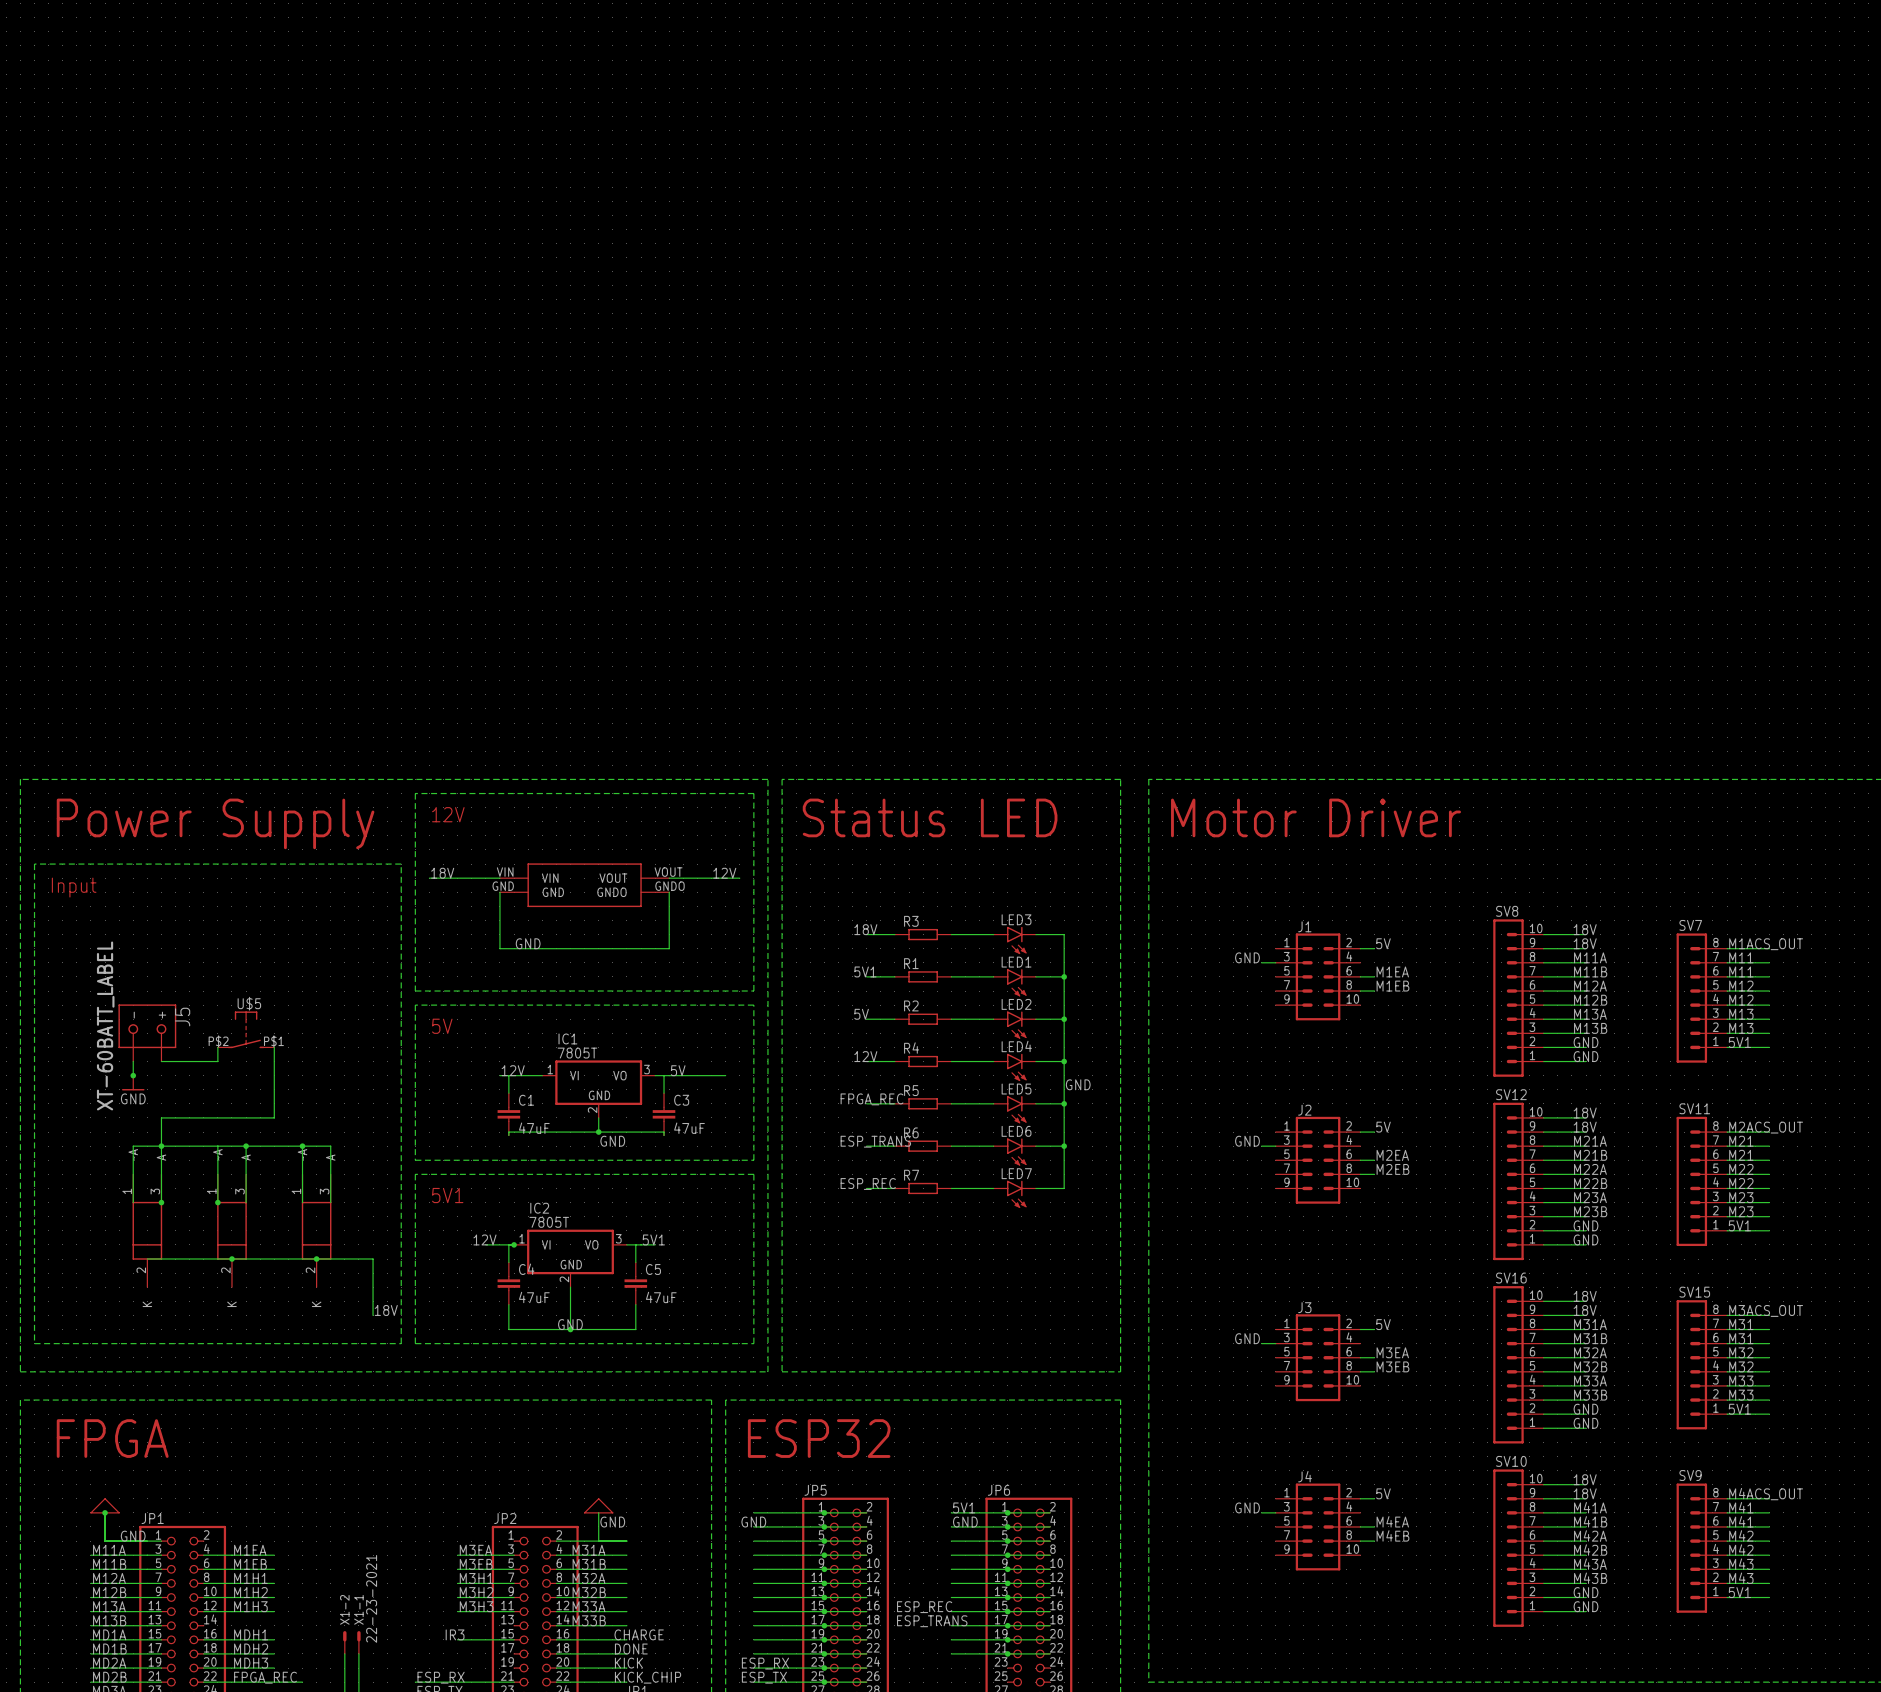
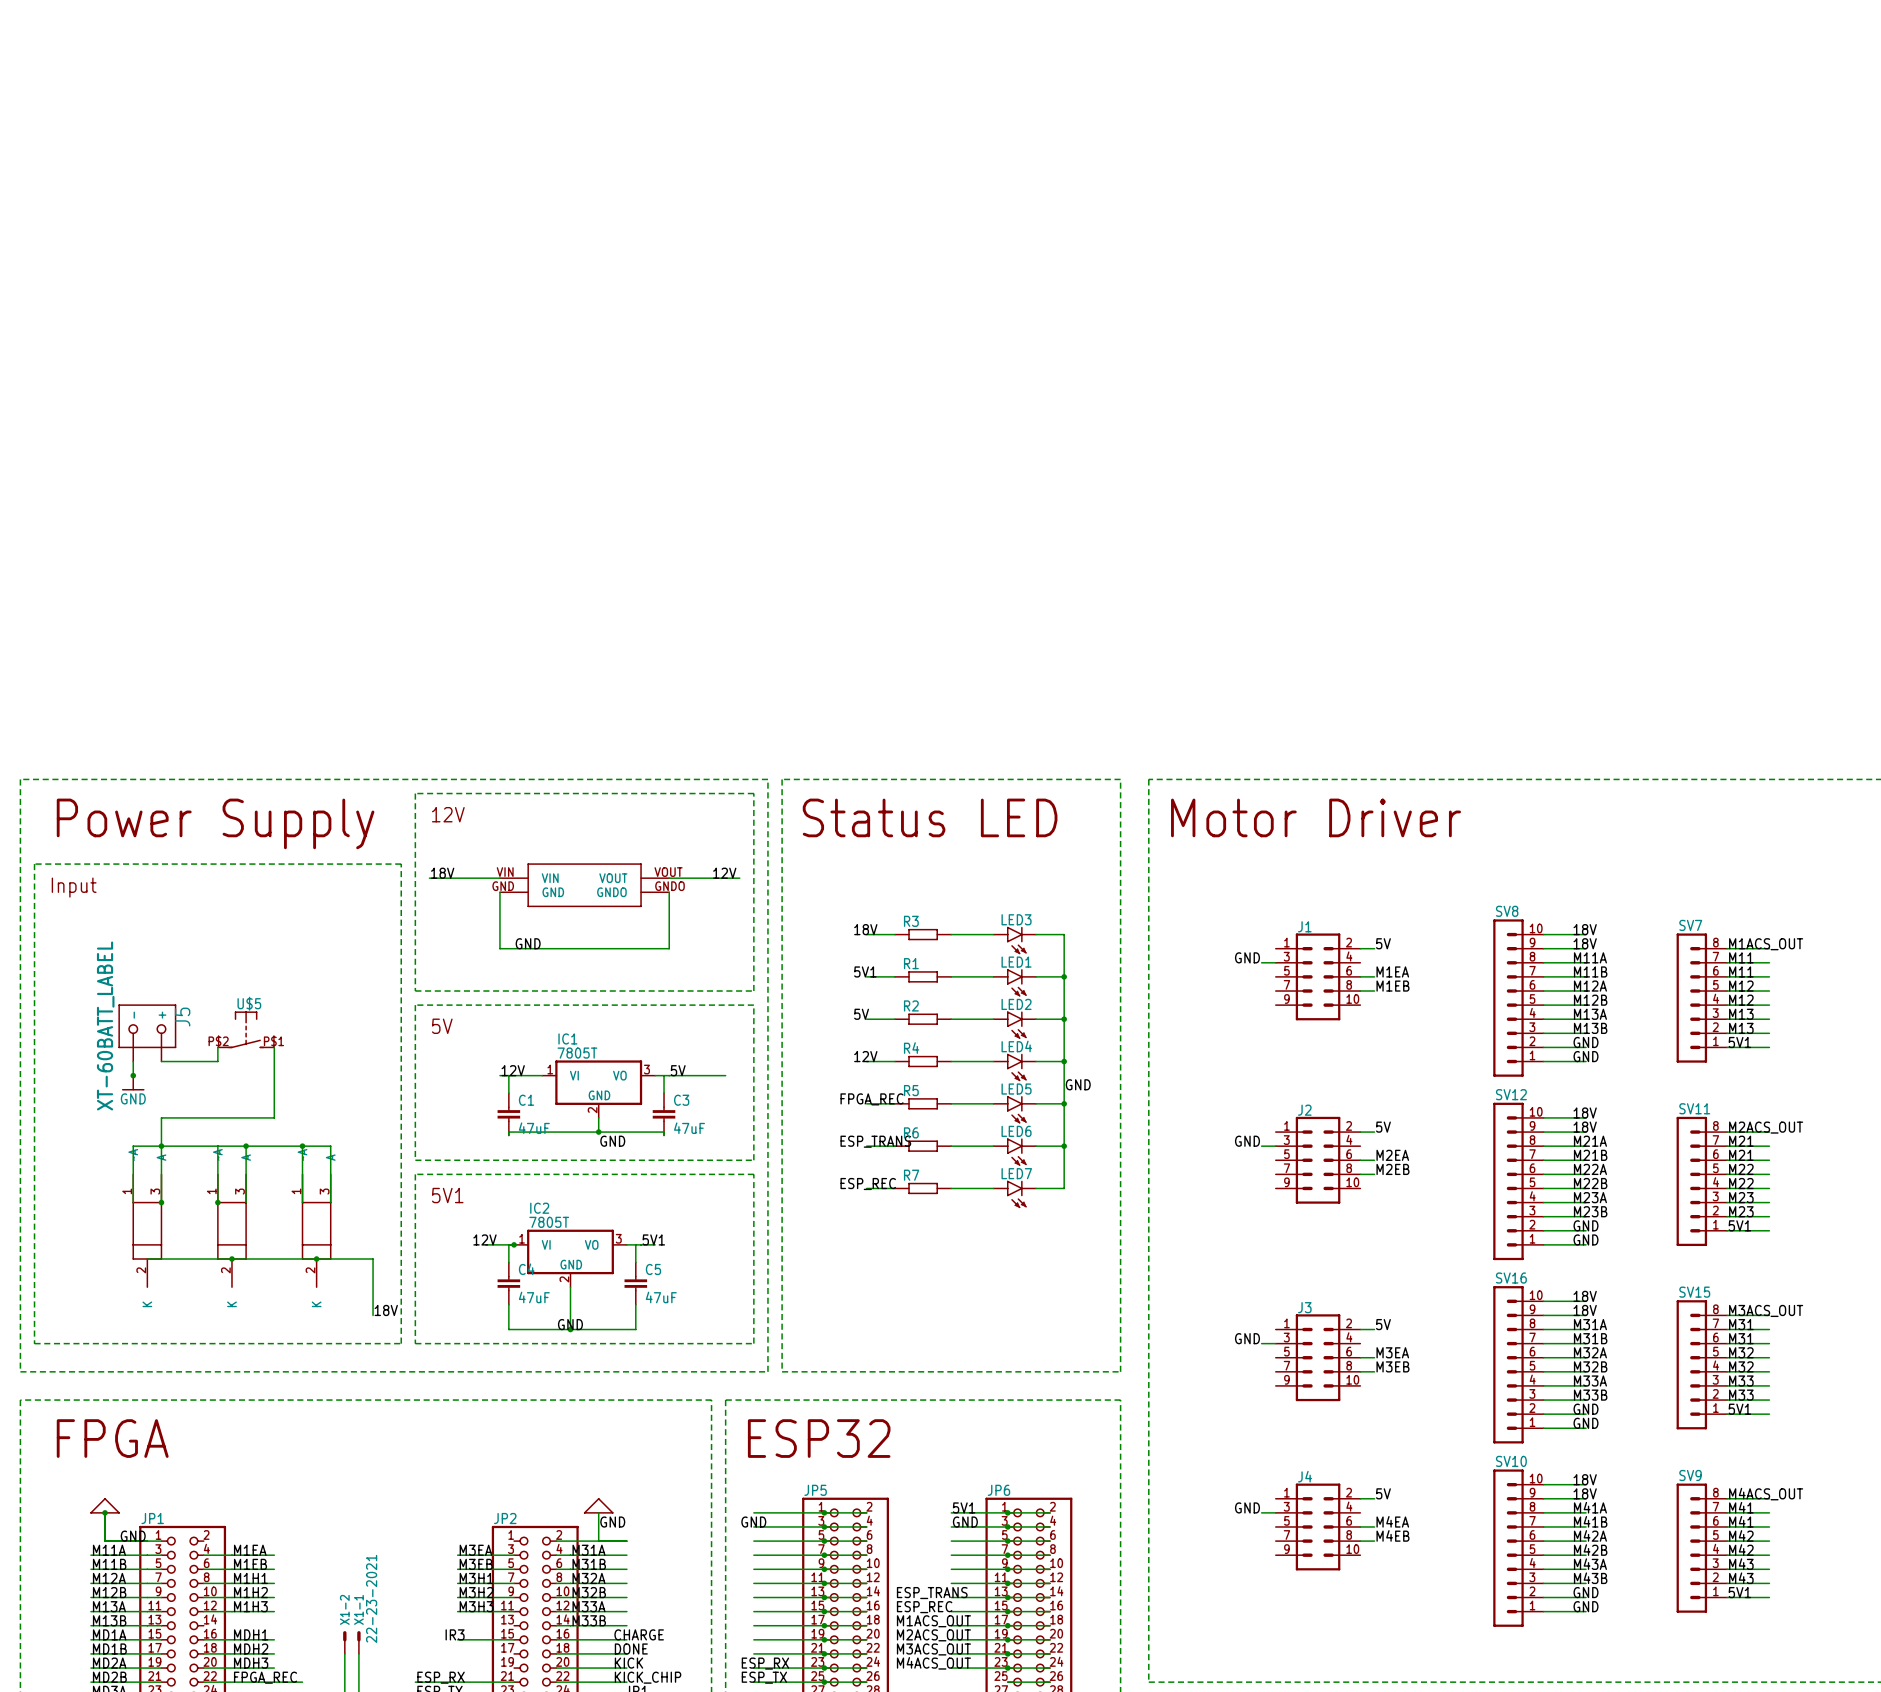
label: none -> ESP_TRANS (932, 1593)
label: ESP_TRANS (932, 1621) -> M1ACS_OUT (933, 1621)
label: none -> M2ACS_OUT (933, 1635)
label: none -> M3ACS_OUT (933, 1649)
label: none -> M4ACS_OUT (933, 1663)
wire: none -> (951, 1668) (1050, 1668)
junction: none -> (1007, 1668)
wire: none -> (1007, 1682) (1050, 1682)

